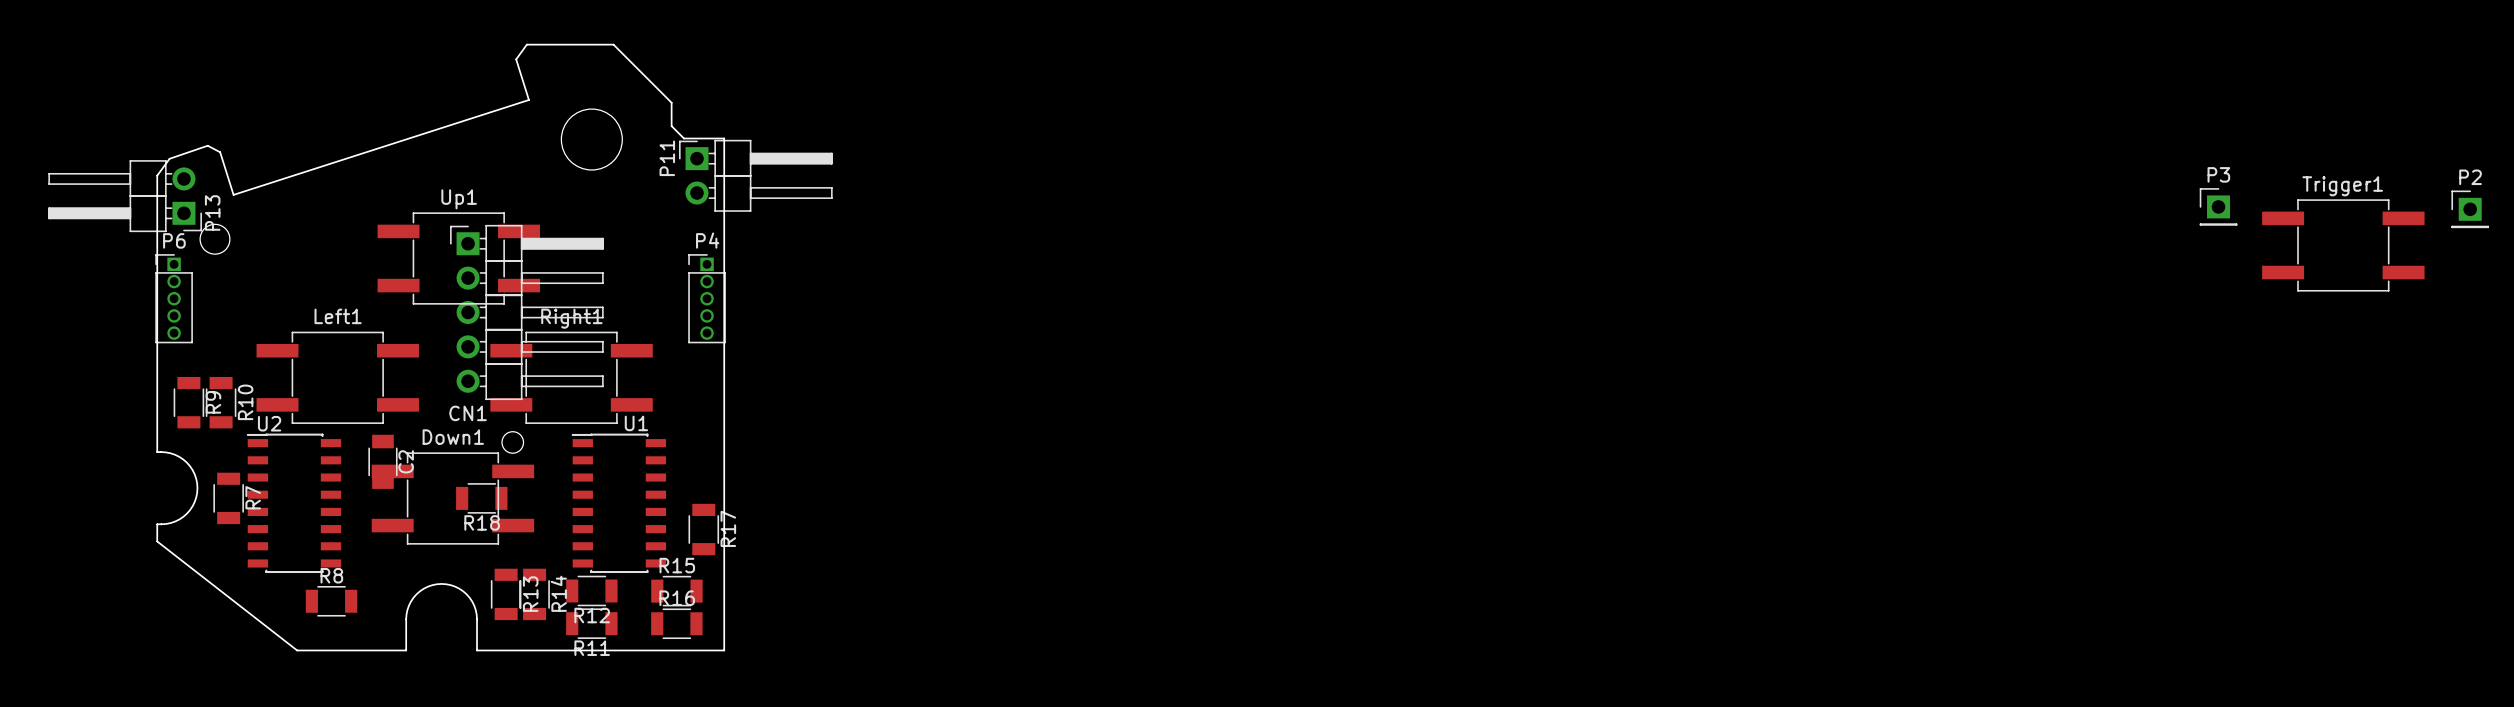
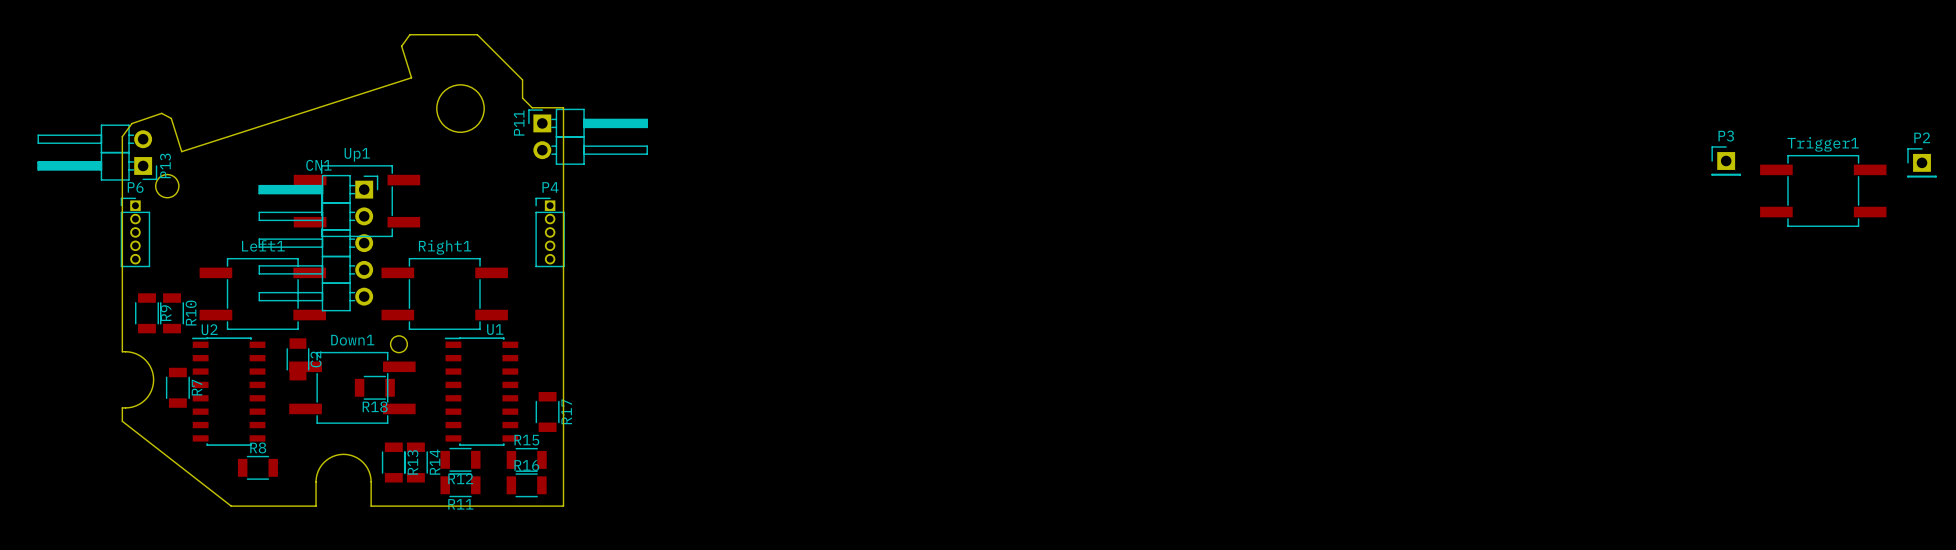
CN1 footprint: [450, 224, 604, 401] -> [258, 174, 379, 312]
CN1 name position: CN1 (468, 413) -> CN1 (318, 165)

